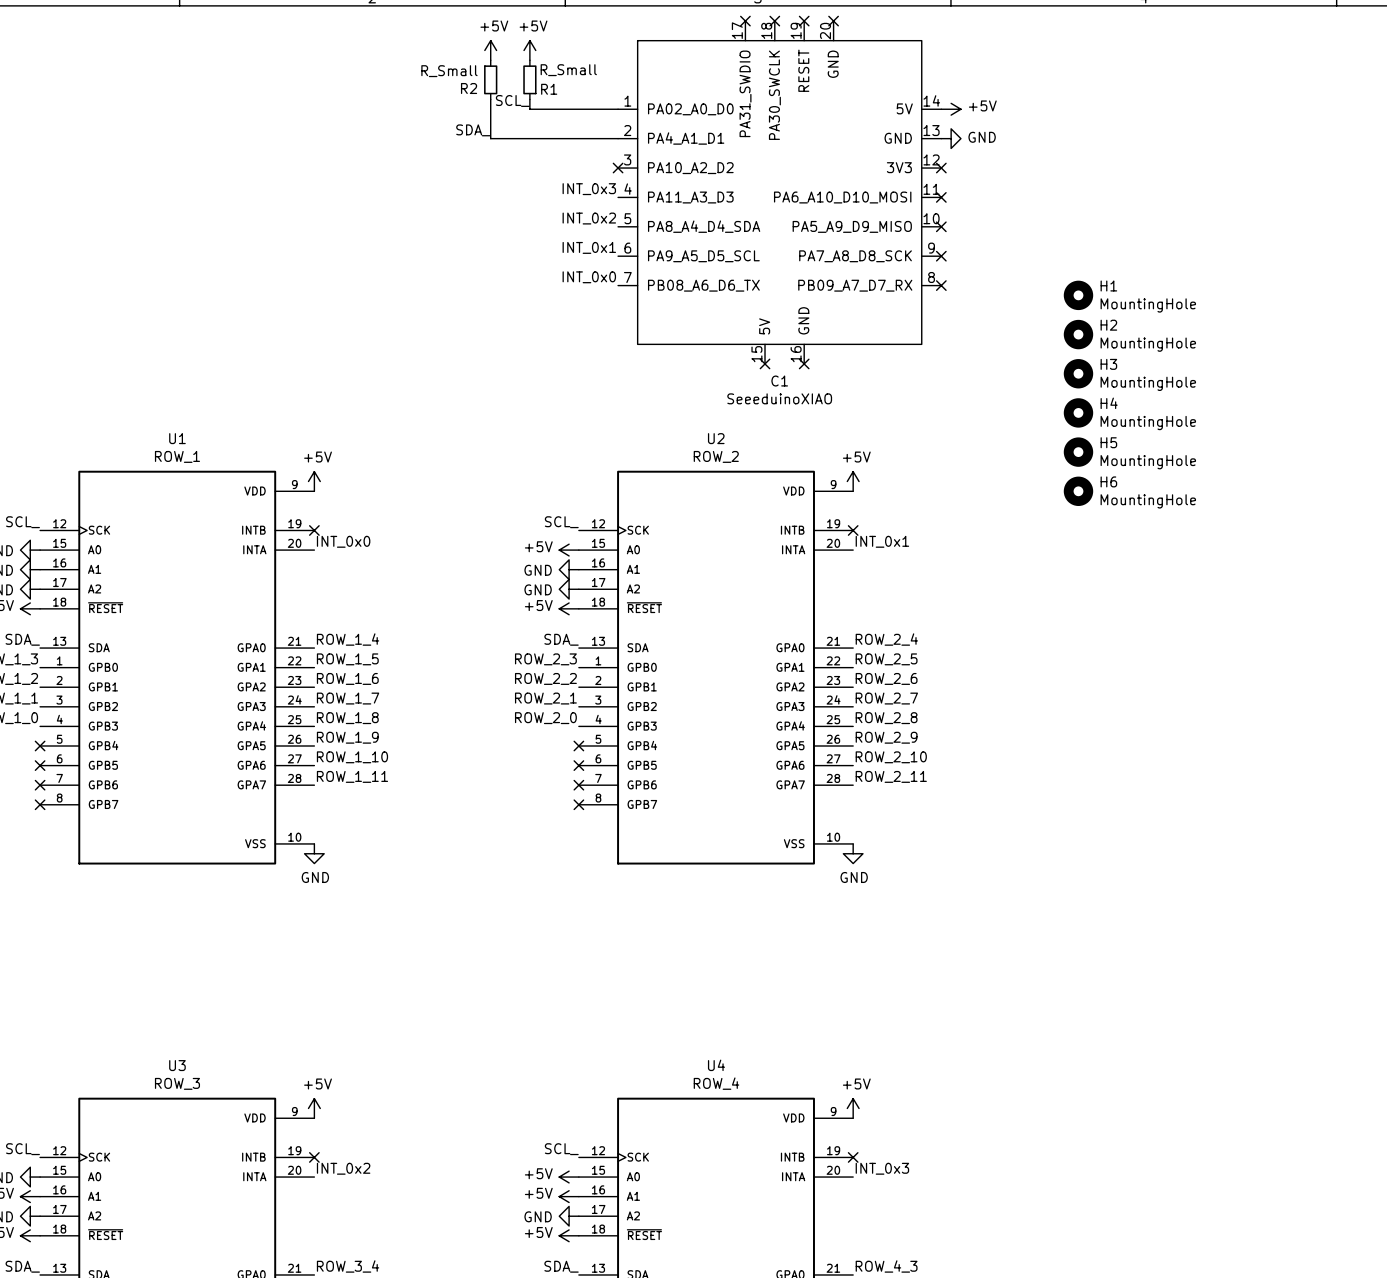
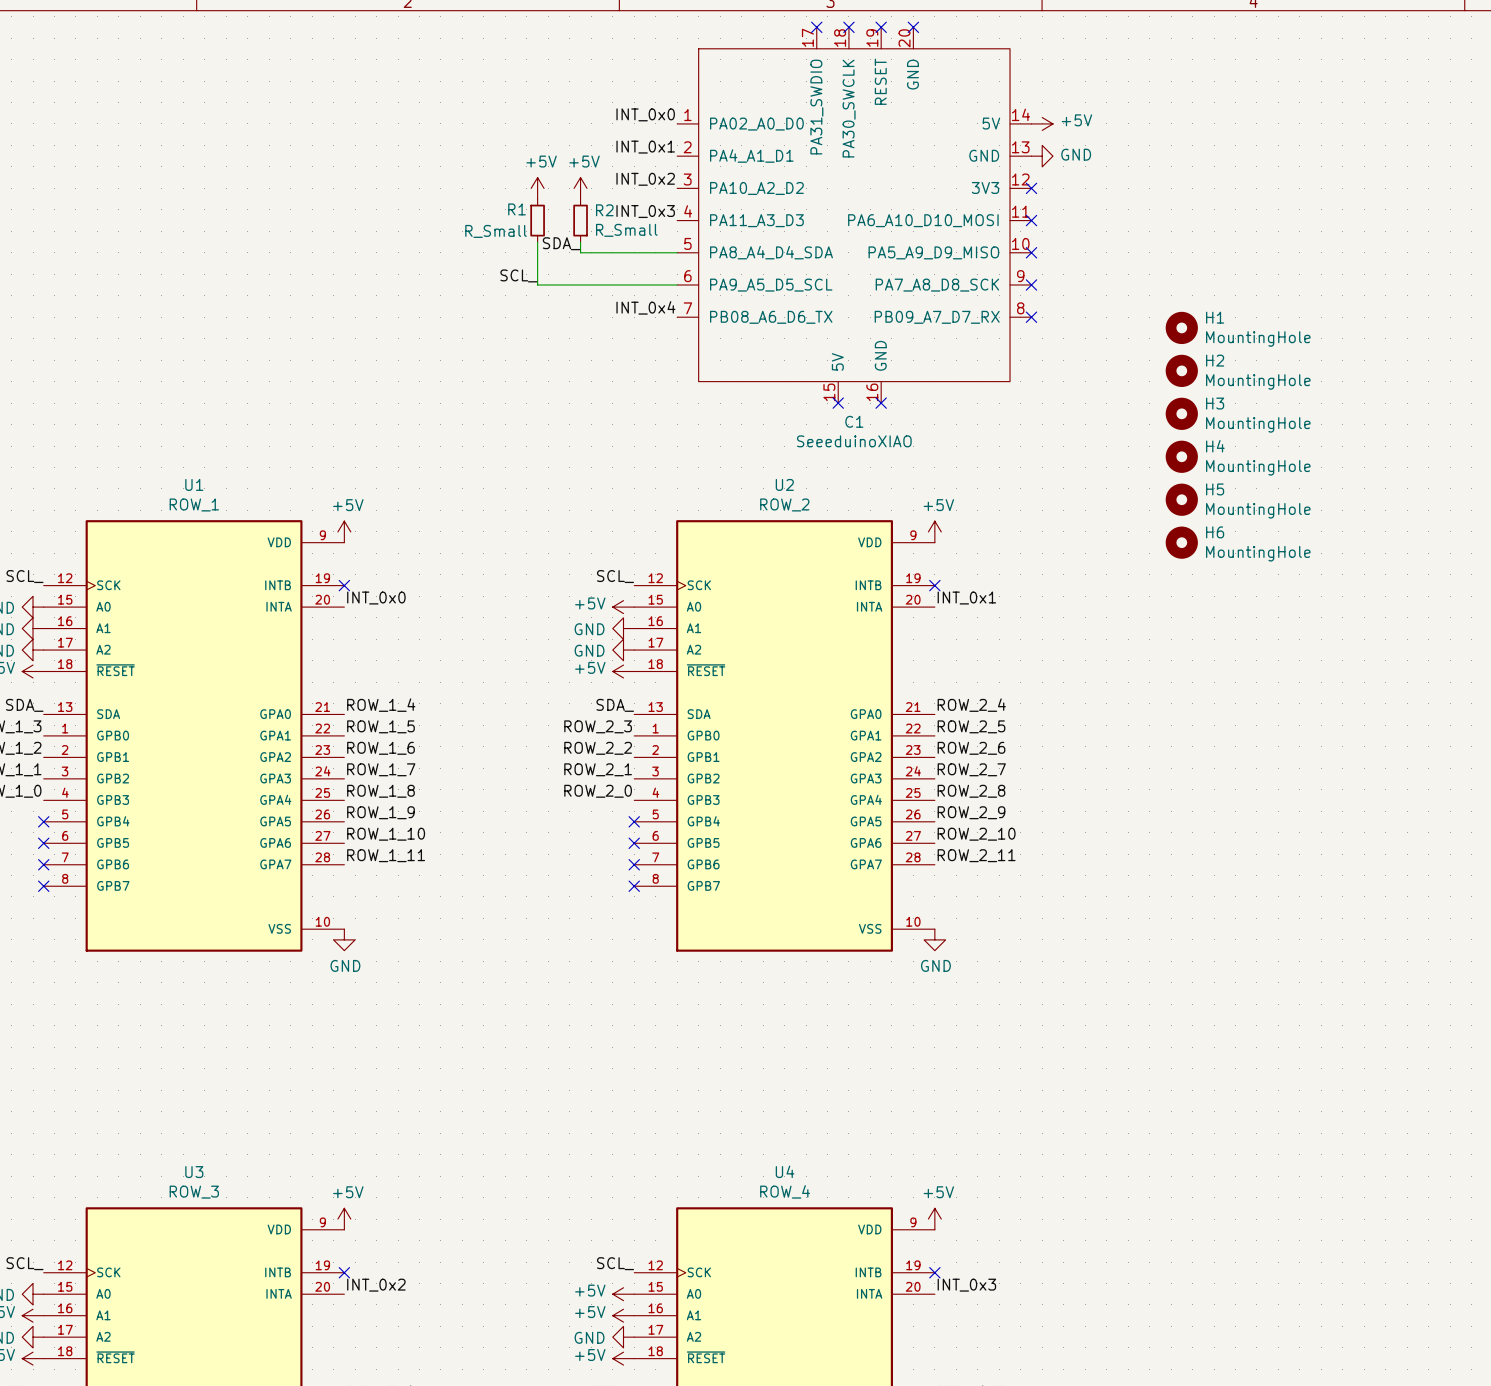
power symbol: +5V (490, 50) -> none
power symbol: +5V (529, 50) -> none
R1 value position: R_Small (568, 70) -> R_Small (496, 231)
R2 value position: R_Small (449, 71) -> R_Small (626, 230)
R2 position: (490, 79) -> (580, 220)
R1 position: (529, 79) -> (537, 220)
R2 name position: R2 (469, 88) -> R2 (604, 210)
R1 name position: R1 (549, 89) -> R1 (516, 209)
wire: (490, 99) (490, 138) (618, 138) -> (537, 242) (537, 284) (677, 284)
wire: (529, 99) (529, 109) (618, 109) -> (580, 242) (580, 252) (677, 252)
label position: SCL_ (512, 100) -> SCL_ (518, 275)
label: none -> INT_0x0 (645, 114)
label position: SDA_ (473, 130) -> SDA_ (561, 243)
power symbol: none -> +5V (537, 188)
power symbol: none -> +5V (580, 188)
no-connect mark: (618, 168) -> none
label position: INT_0x2 (589, 218) -> INT_0x2 (645, 179)
label position: INT_0x1 (589, 247) -> INT_0x1 (645, 147)
label: INT_0x0 (589, 277) -> INT_0x4 (645, 307)

